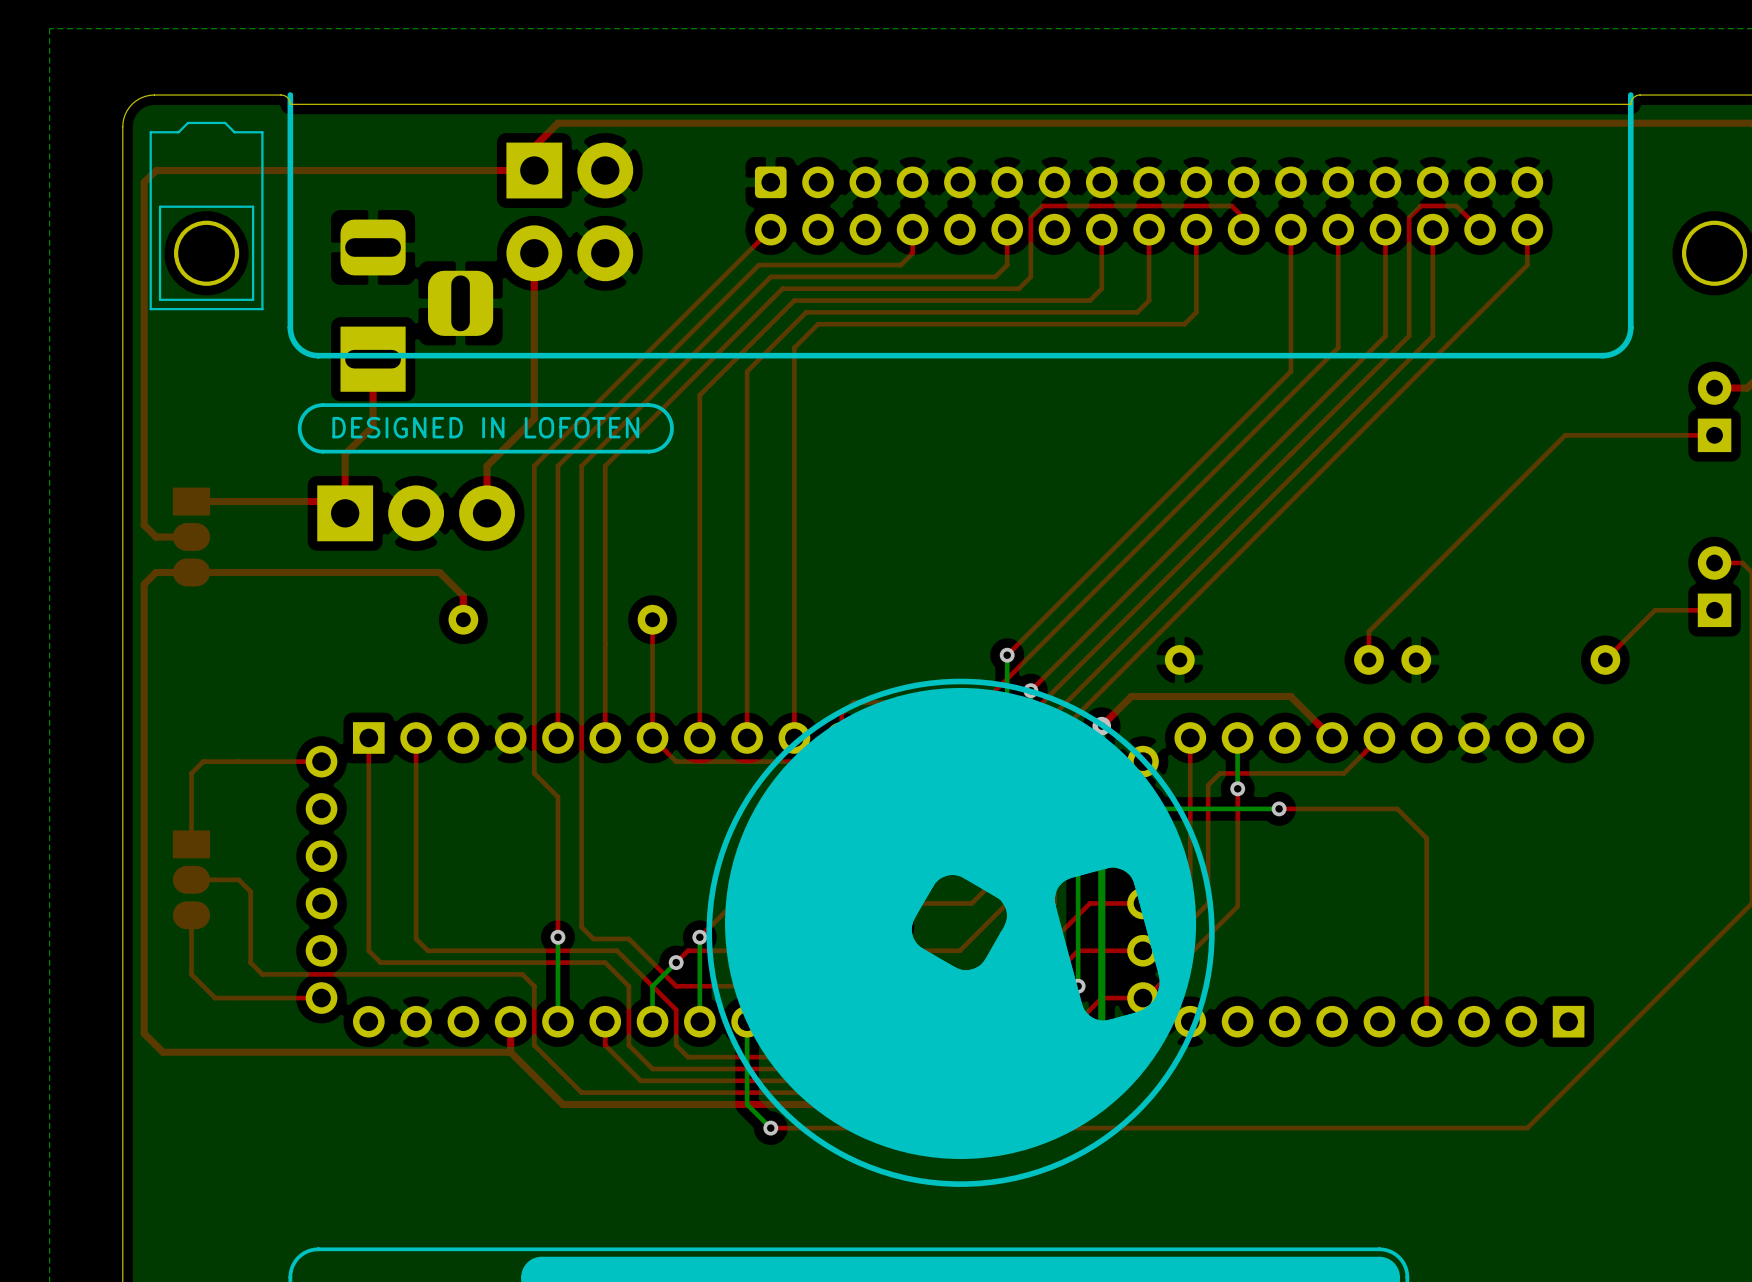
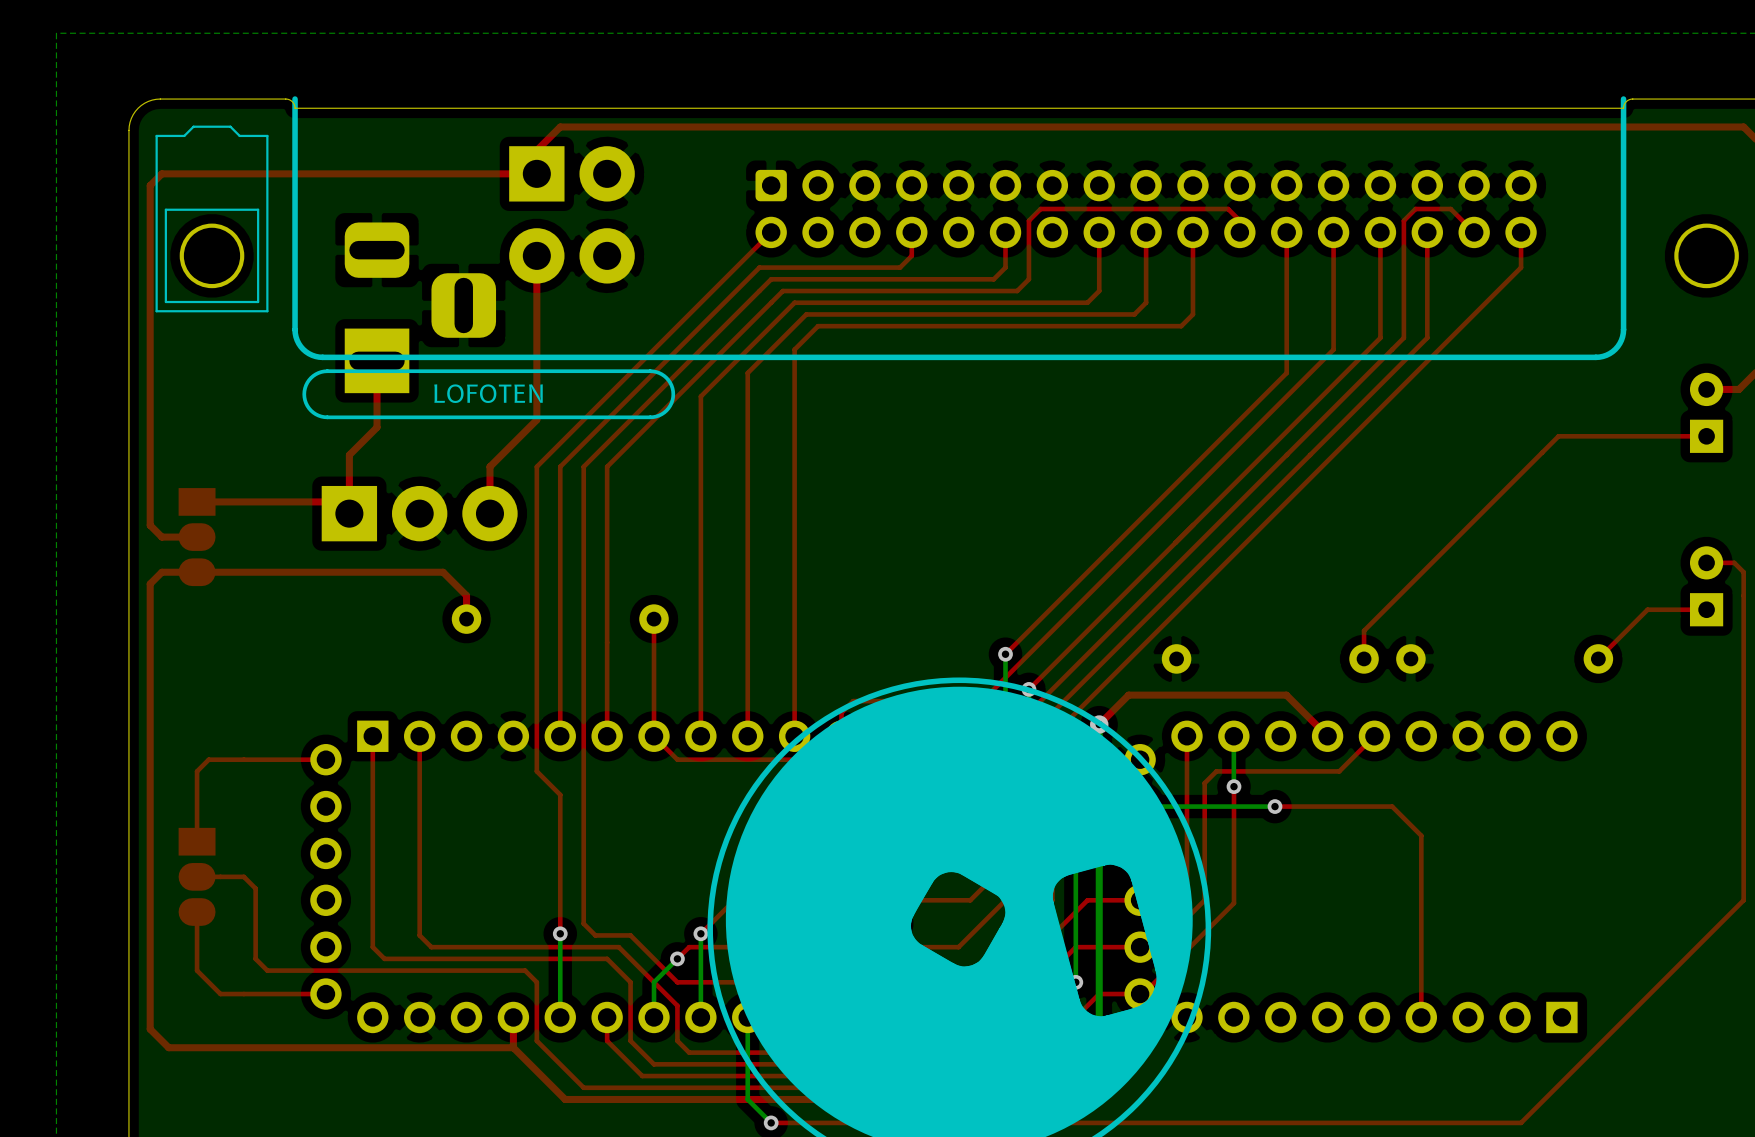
text: none -> LOFOTEN (488, 393)
line: (648, 405) (319, 405) (311, 408) (304, 414) (300, 422) (299, 431) (306, 444) (314, 449) (322, 451) (651, 451) (660, 448) (667, 442) (671, 434) (671, 425) (665, 411) (657, 406) (648, 405) -> (650, 371) (324, 371) (315, 374) (309, 380) (305, 388) (304, 397) (311, 410) (318, 415) (327, 417) (653, 417) (661, 414) (668, 408) (672, 400) (673, 391) (666, 377) (659, 372) (650, 371)
text: DESIGNED IN LOFOTEN (485, 427) -> none

